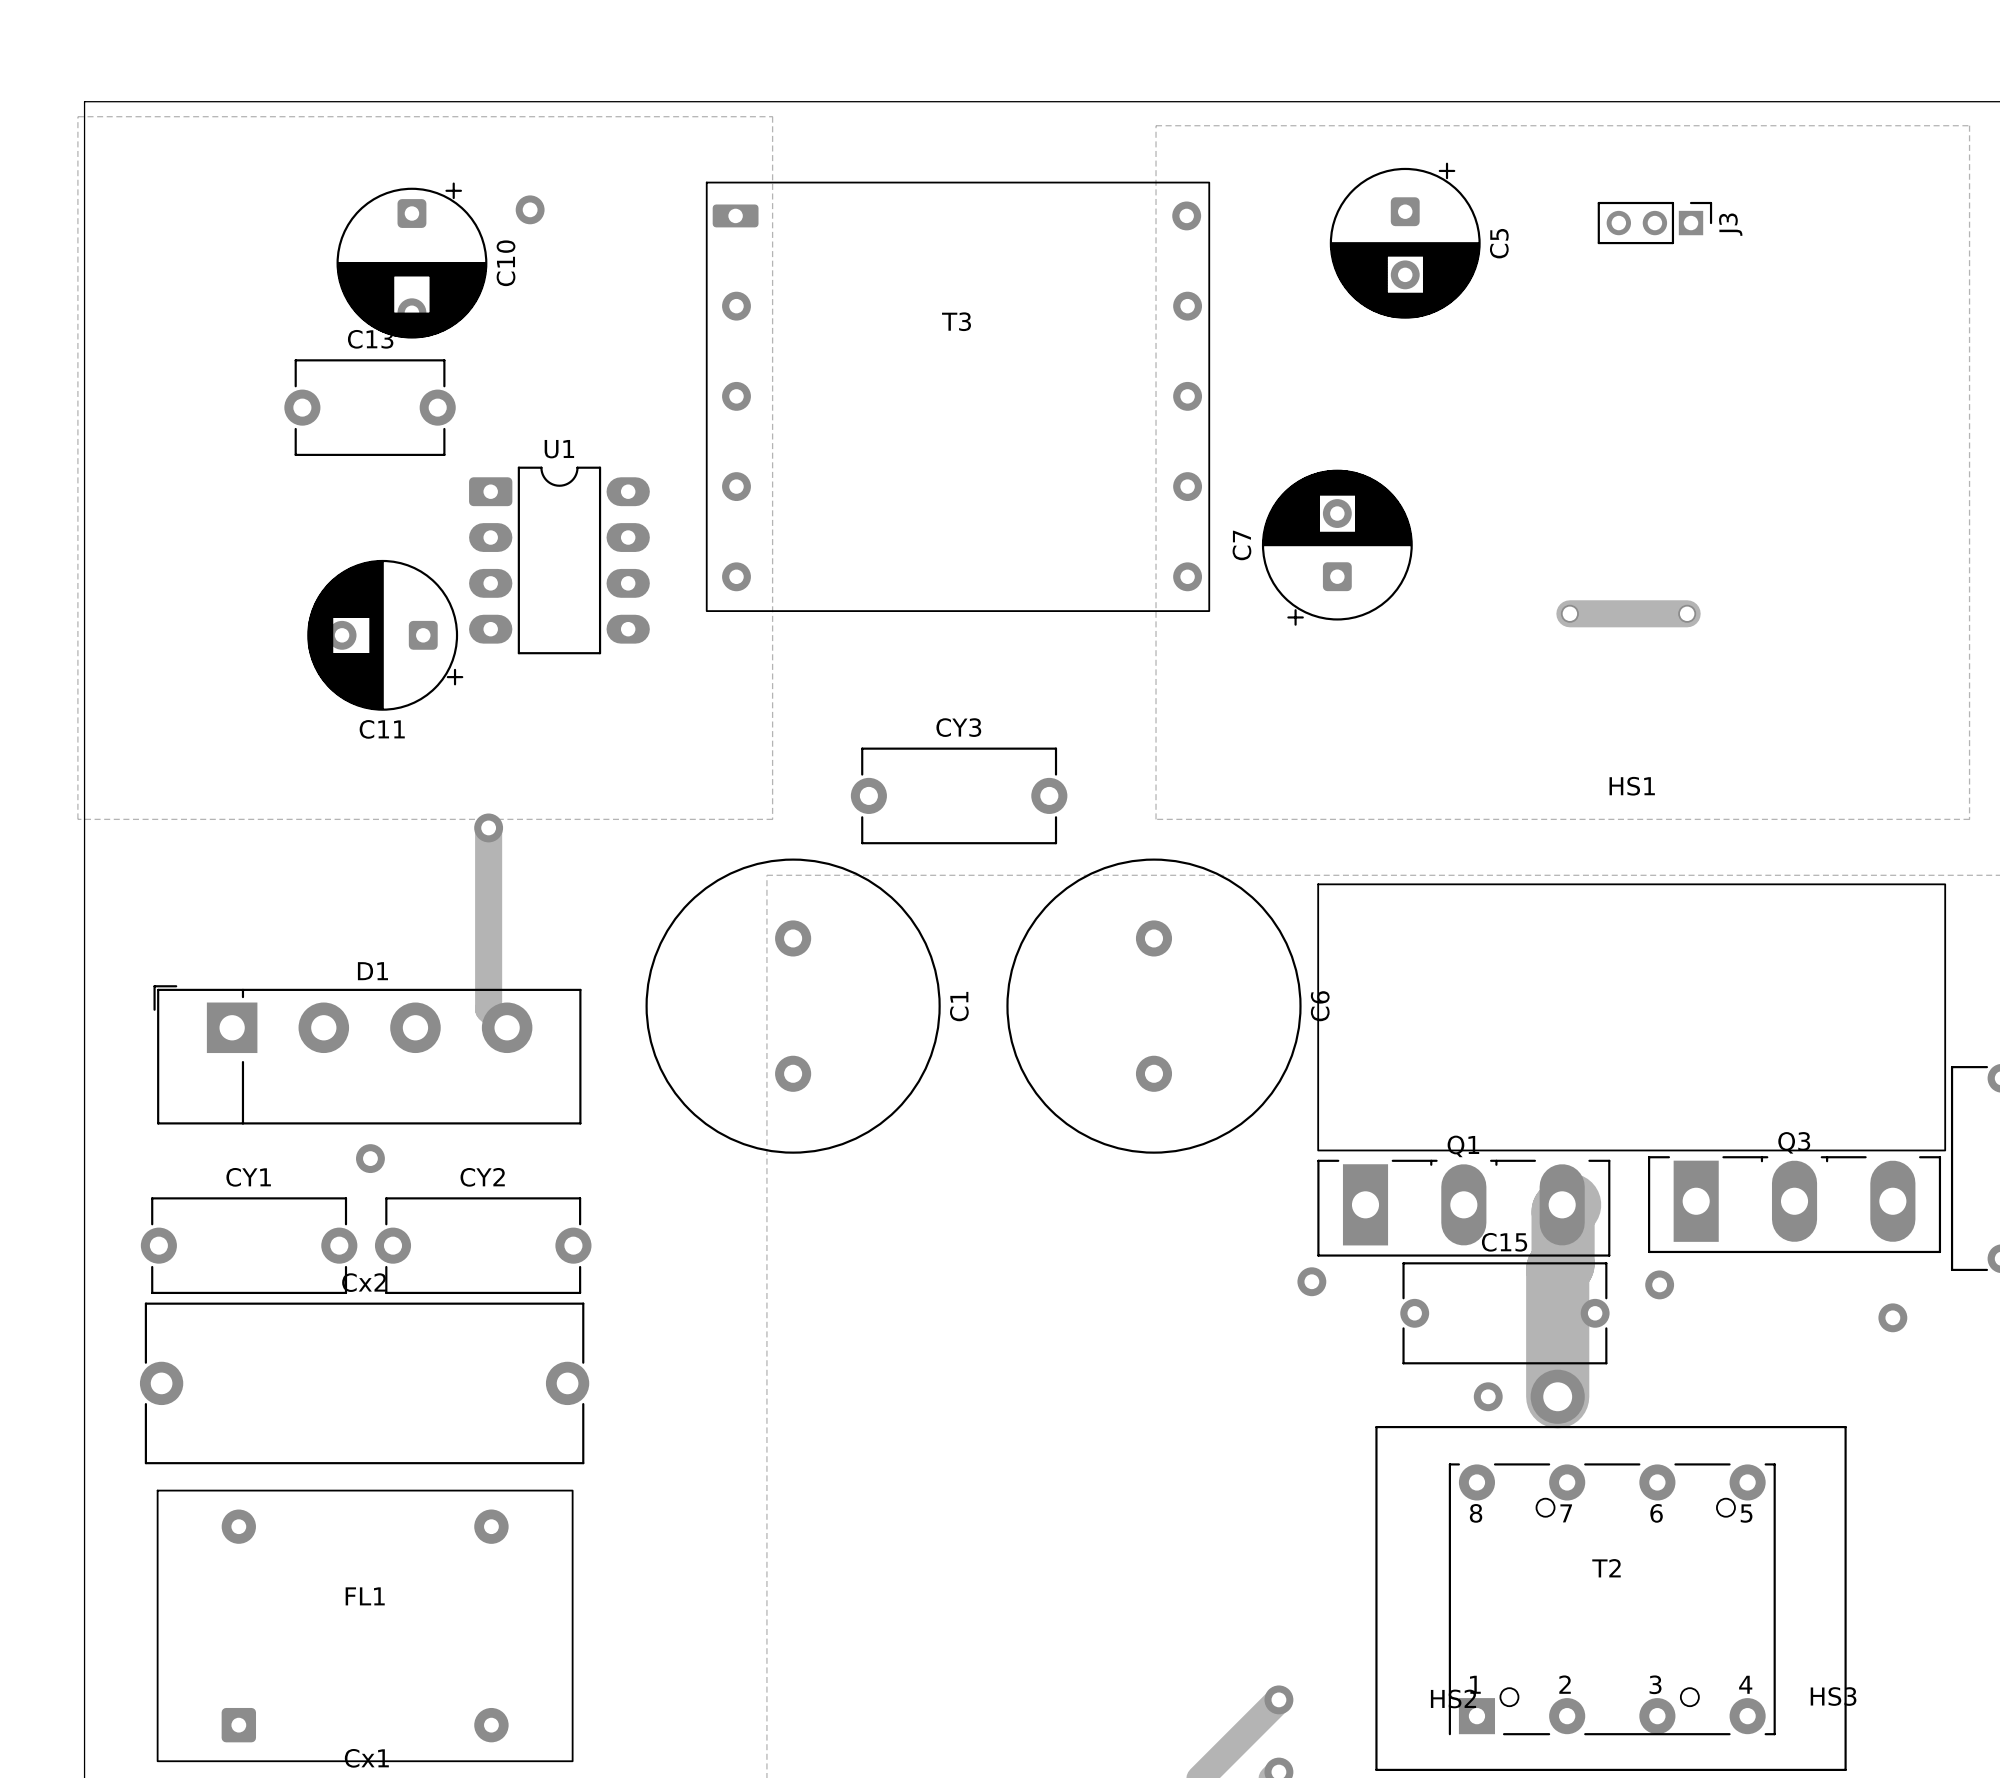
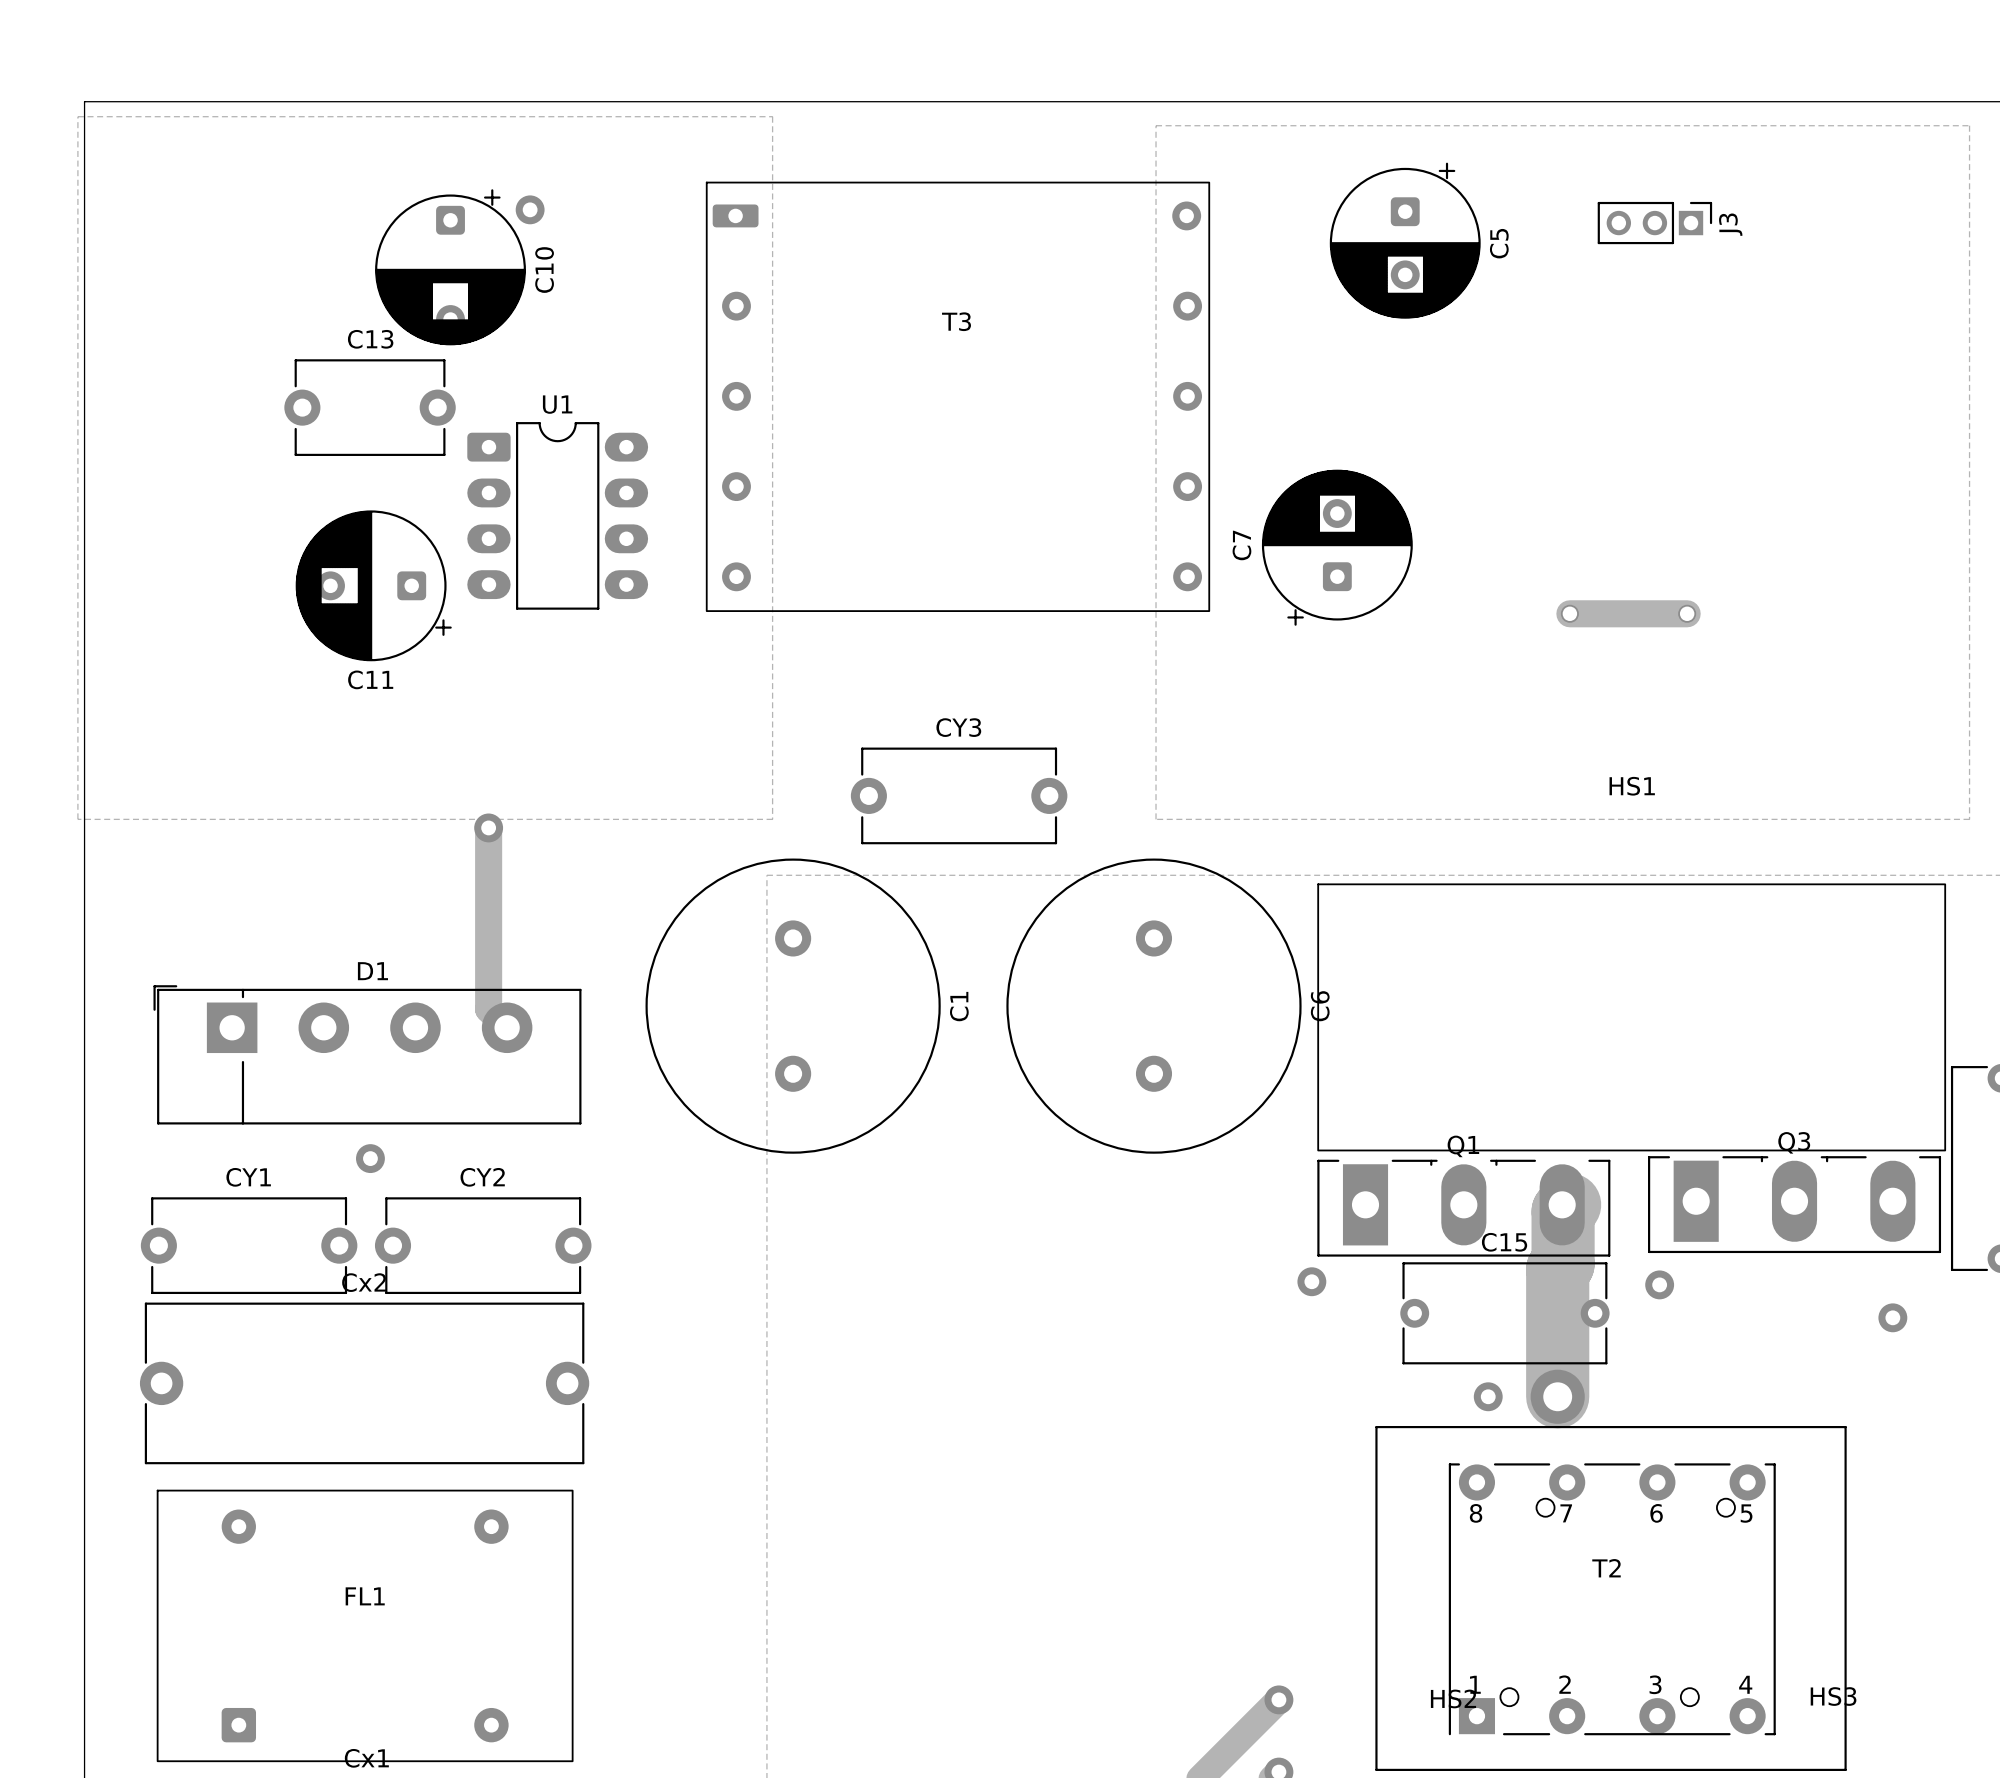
C10 position: (411, 260) -> (450, 267)
U1 position: (559, 560) -> (557, 515)
C11 position: (385, 635) -> (373, 585)

